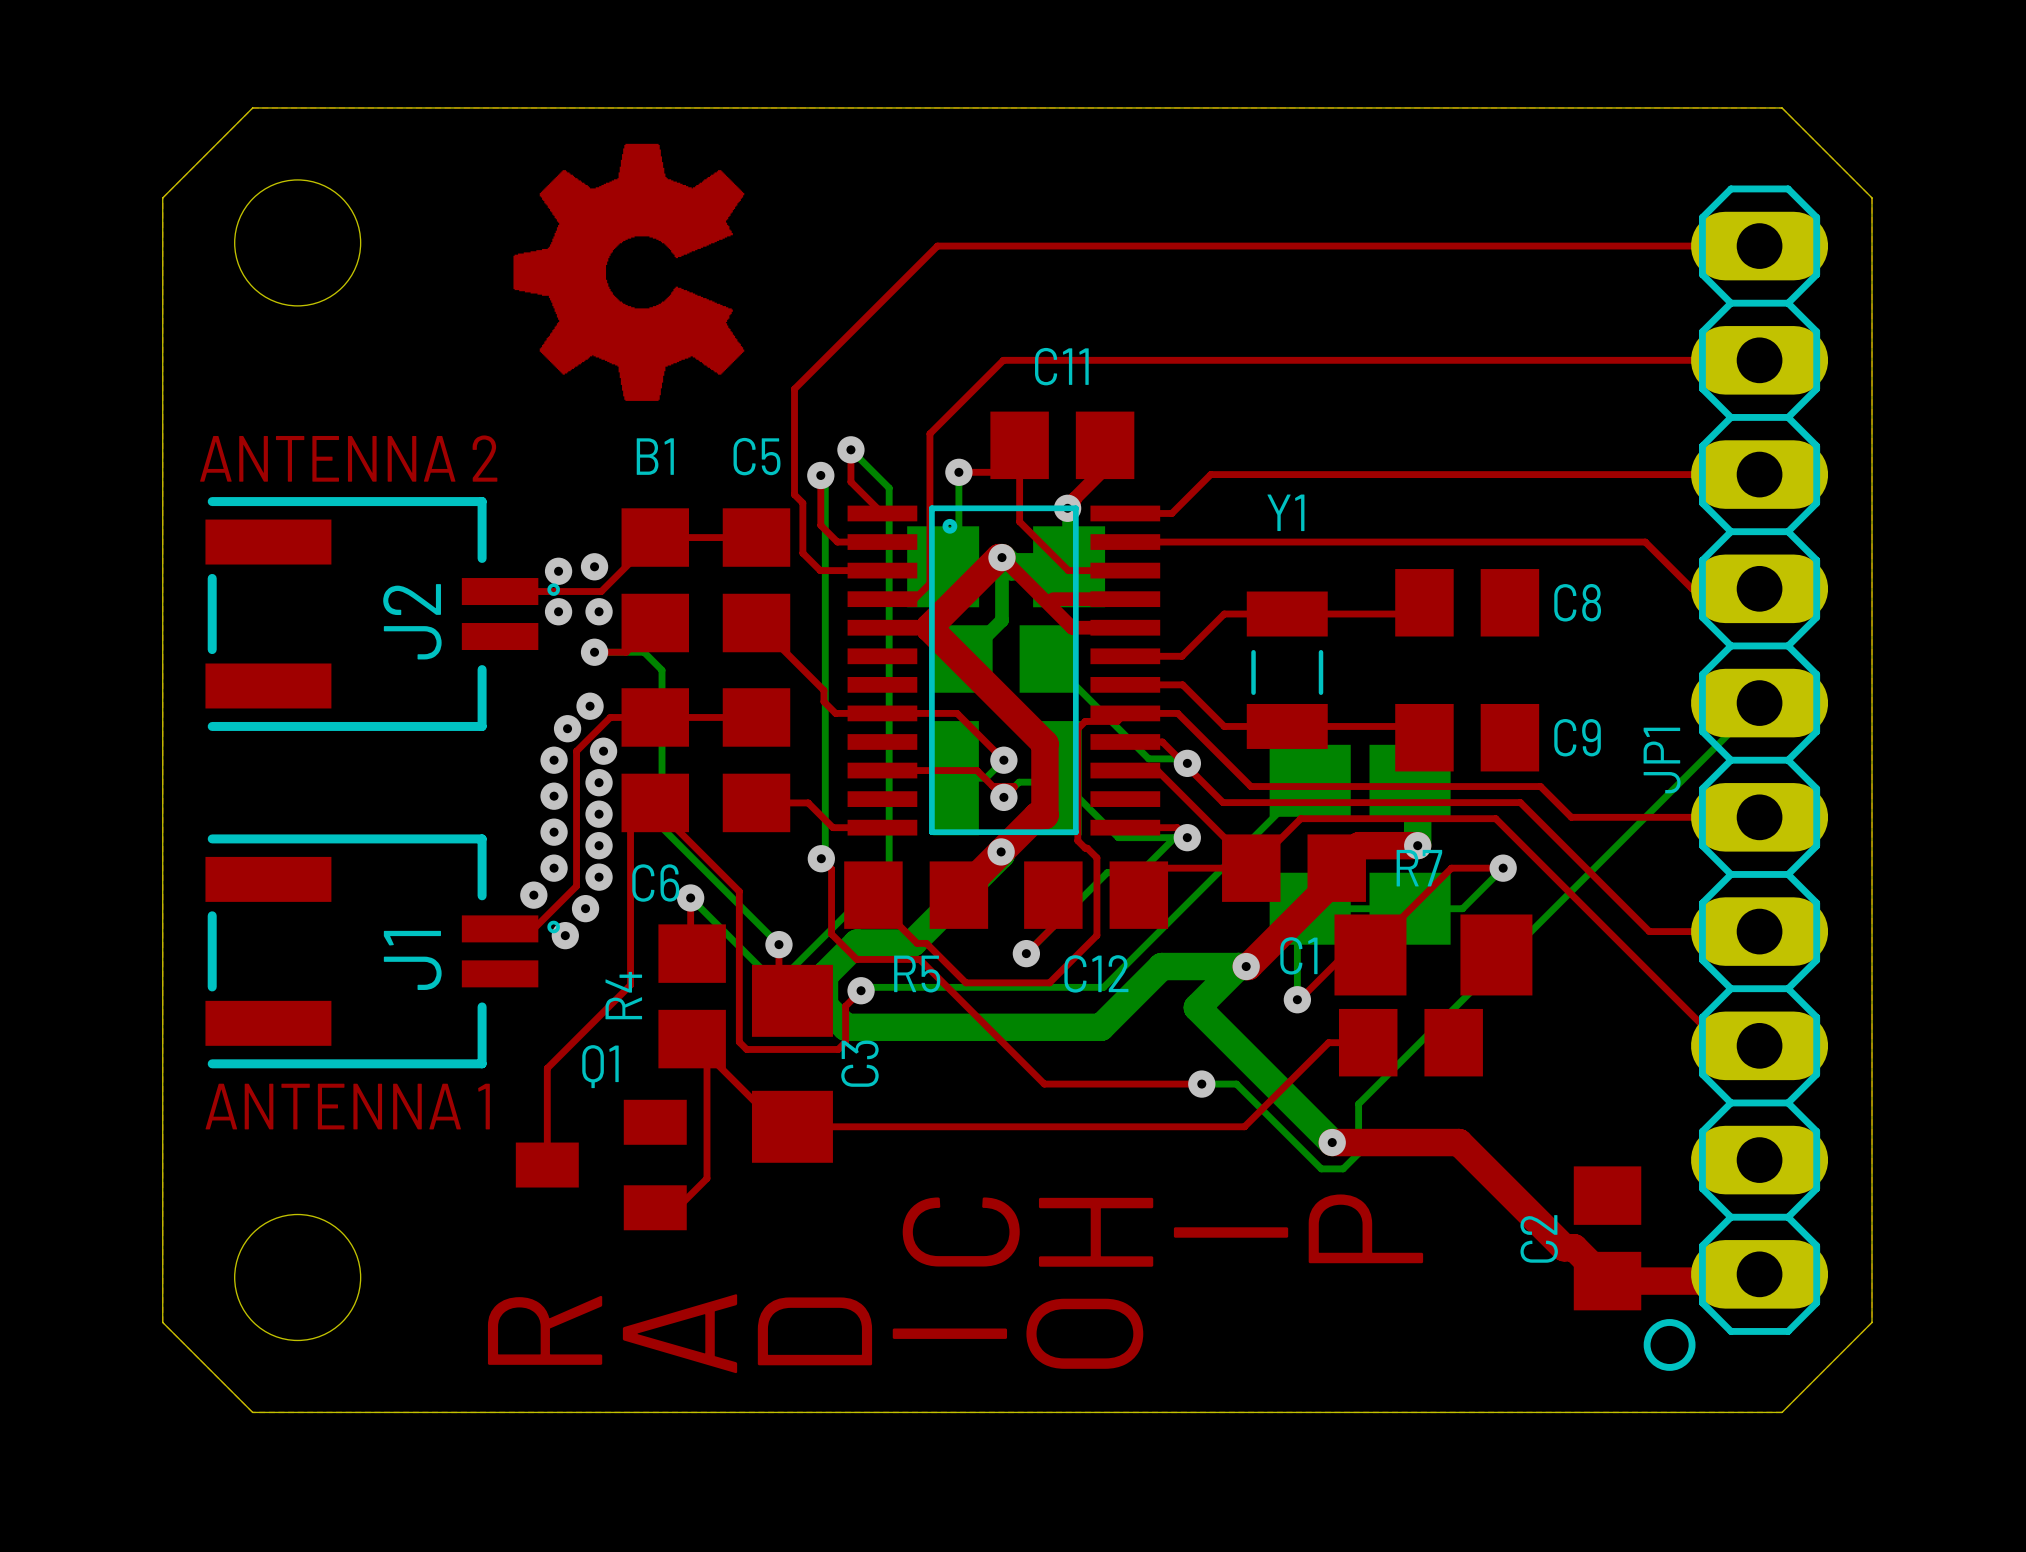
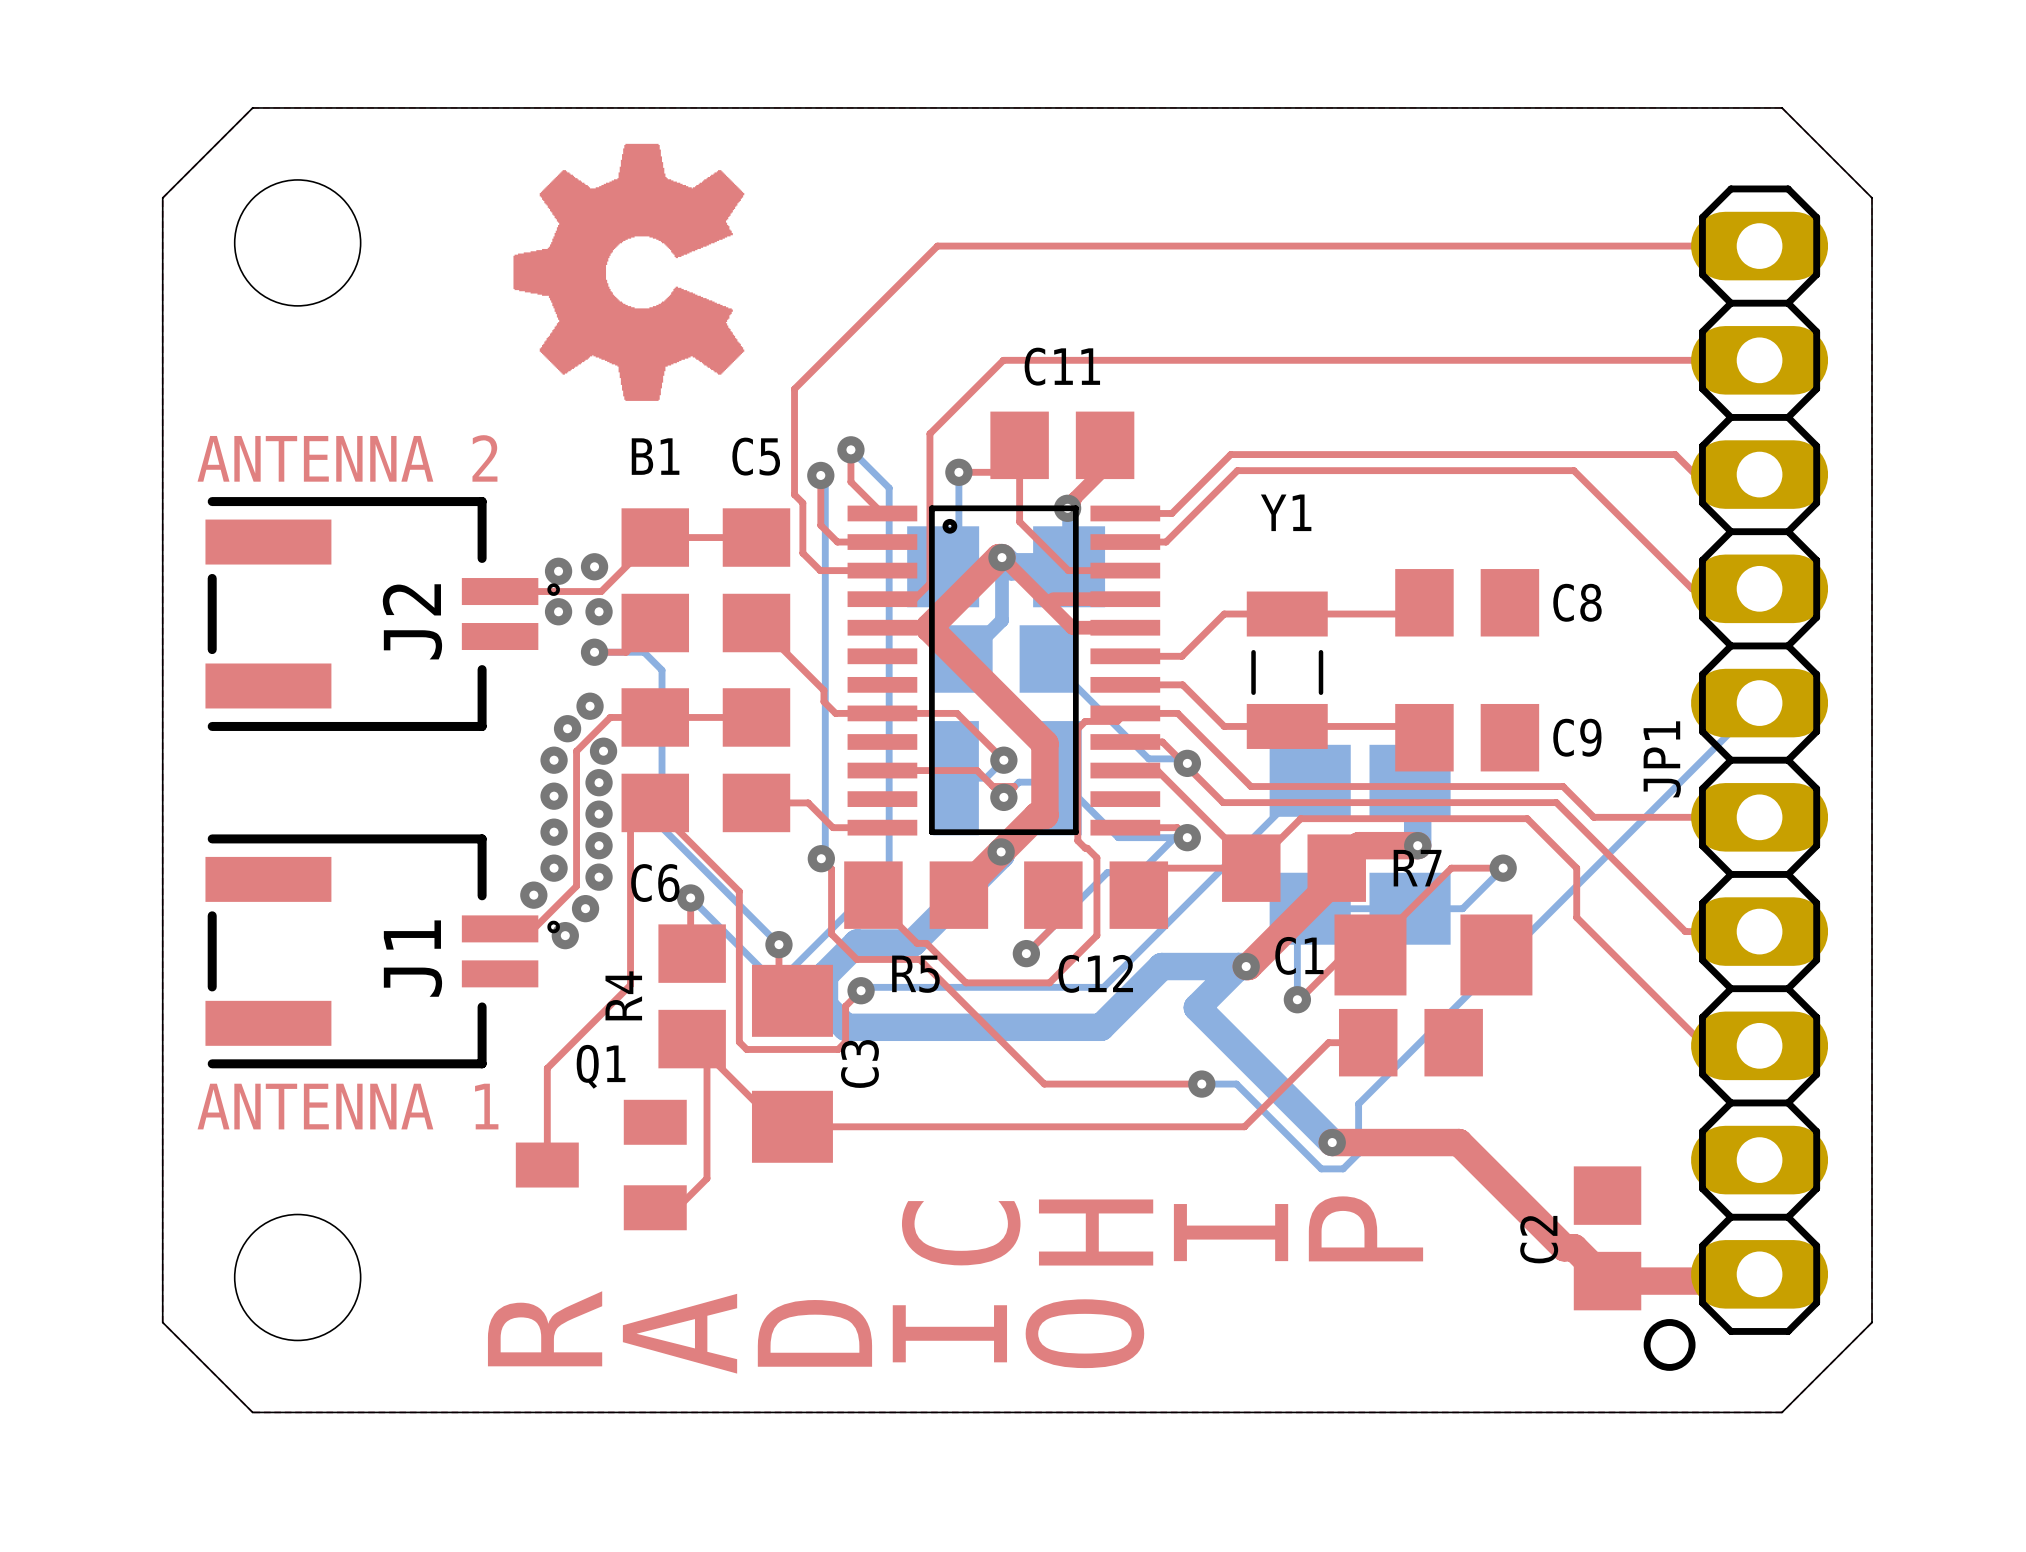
top track: (1210, 474) (1695, 474) -> (1210, 474) (1230, 454) (1675, 454) (1695, 474)
top track: (1166, 542) (1645, 542) -> (1166, 542) (1237, 470) (1573, 470) (1645, 542)
top track: (1540, 786) (1571, 817) (1593, 817) -> (1540, 786) (1563, 786) (1593, 817)
top track: (1520, 802) (1649, 931) (1685, 931) -> (1520, 802) (1556, 802) (1685, 931)
top track: (1495, 818) (1722, 1045) -> (1495, 818) (1527, 818) (1576, 868) (1576, 917) (1704, 1045) (1722, 1045)

